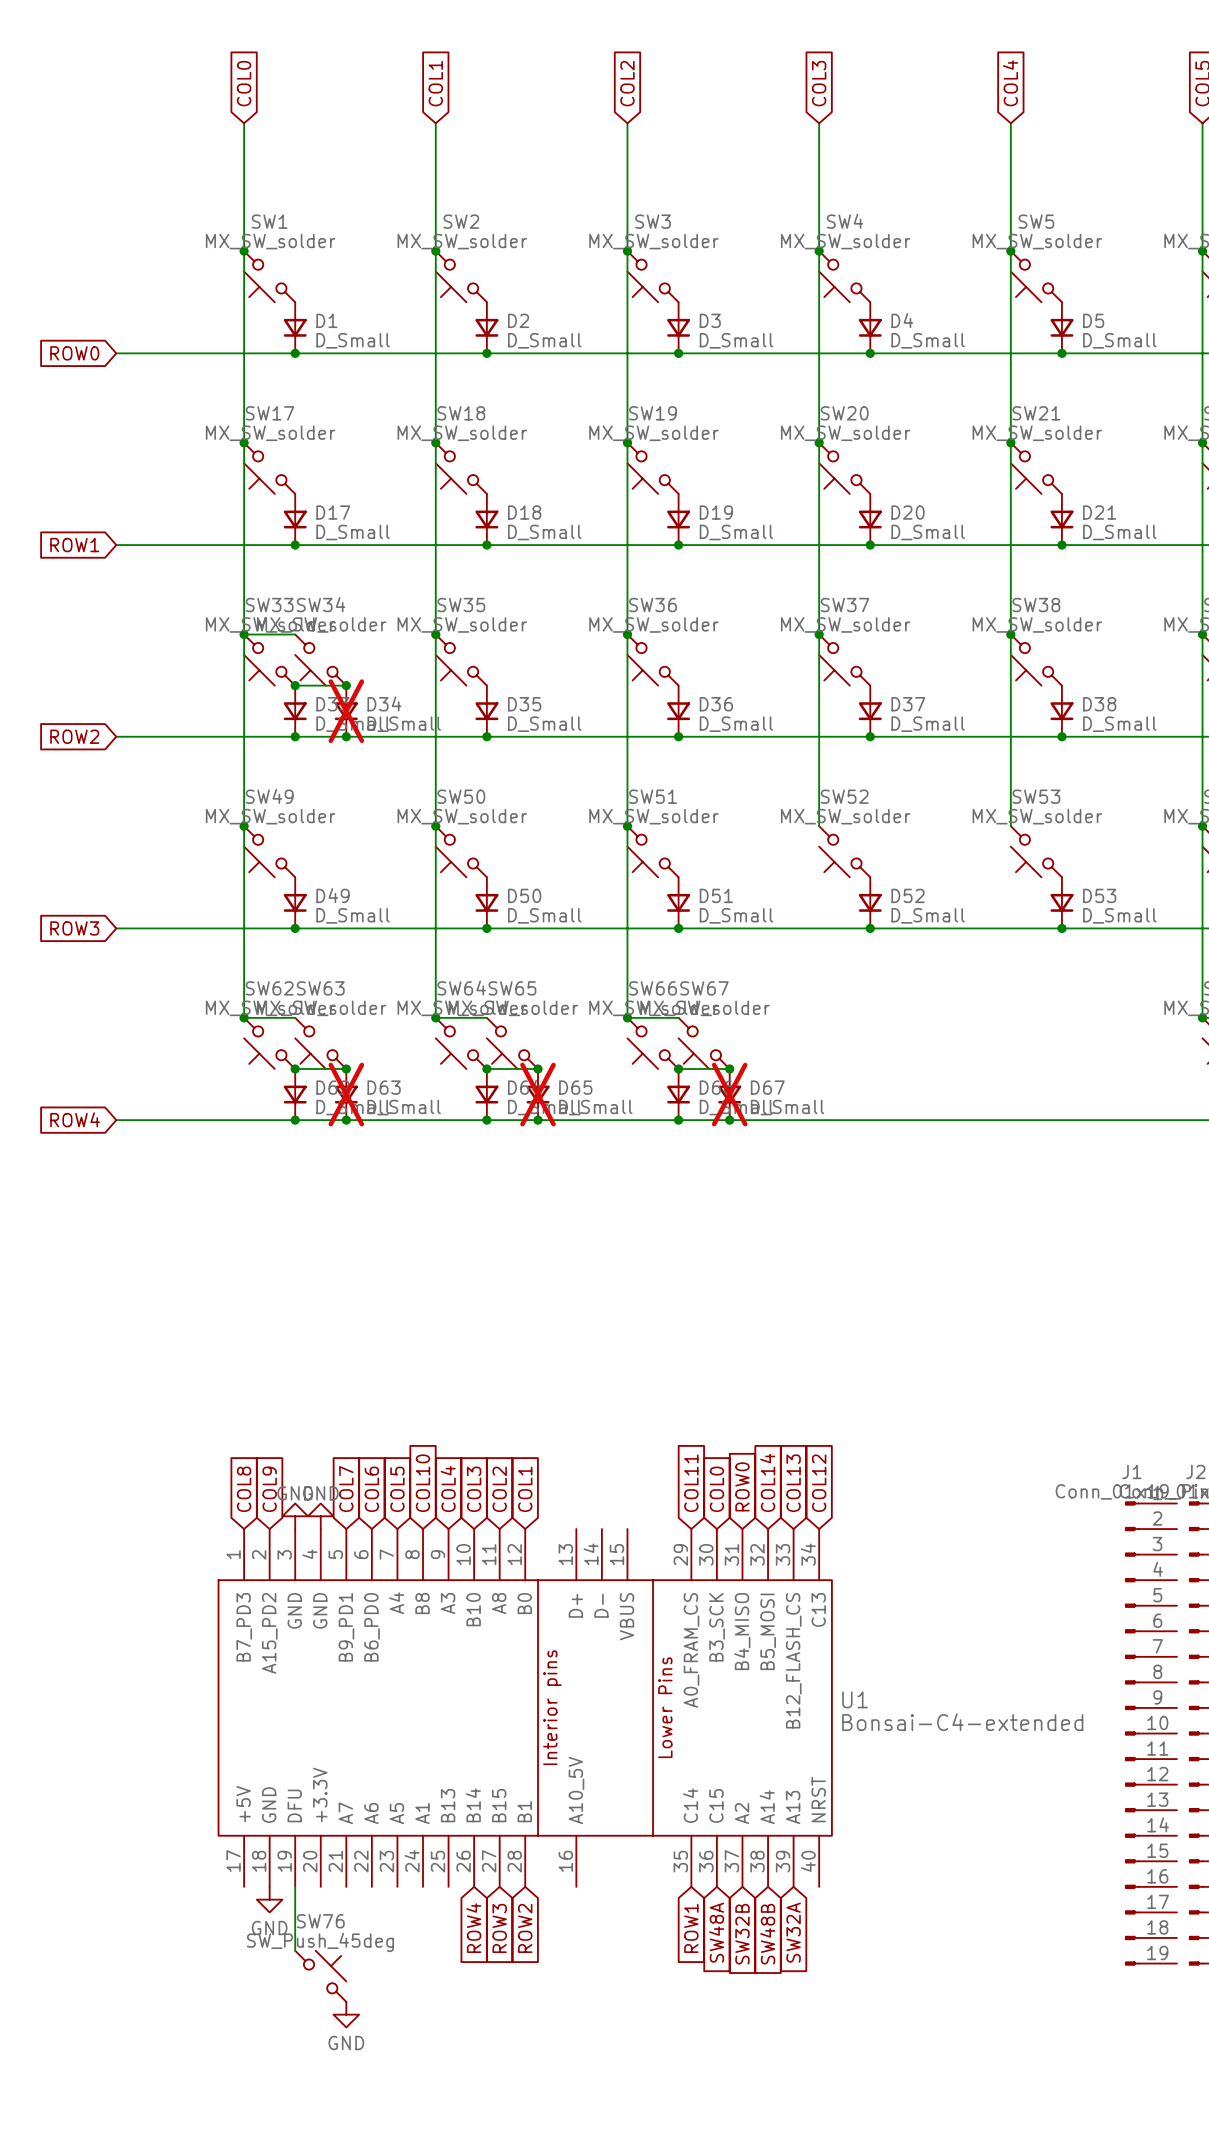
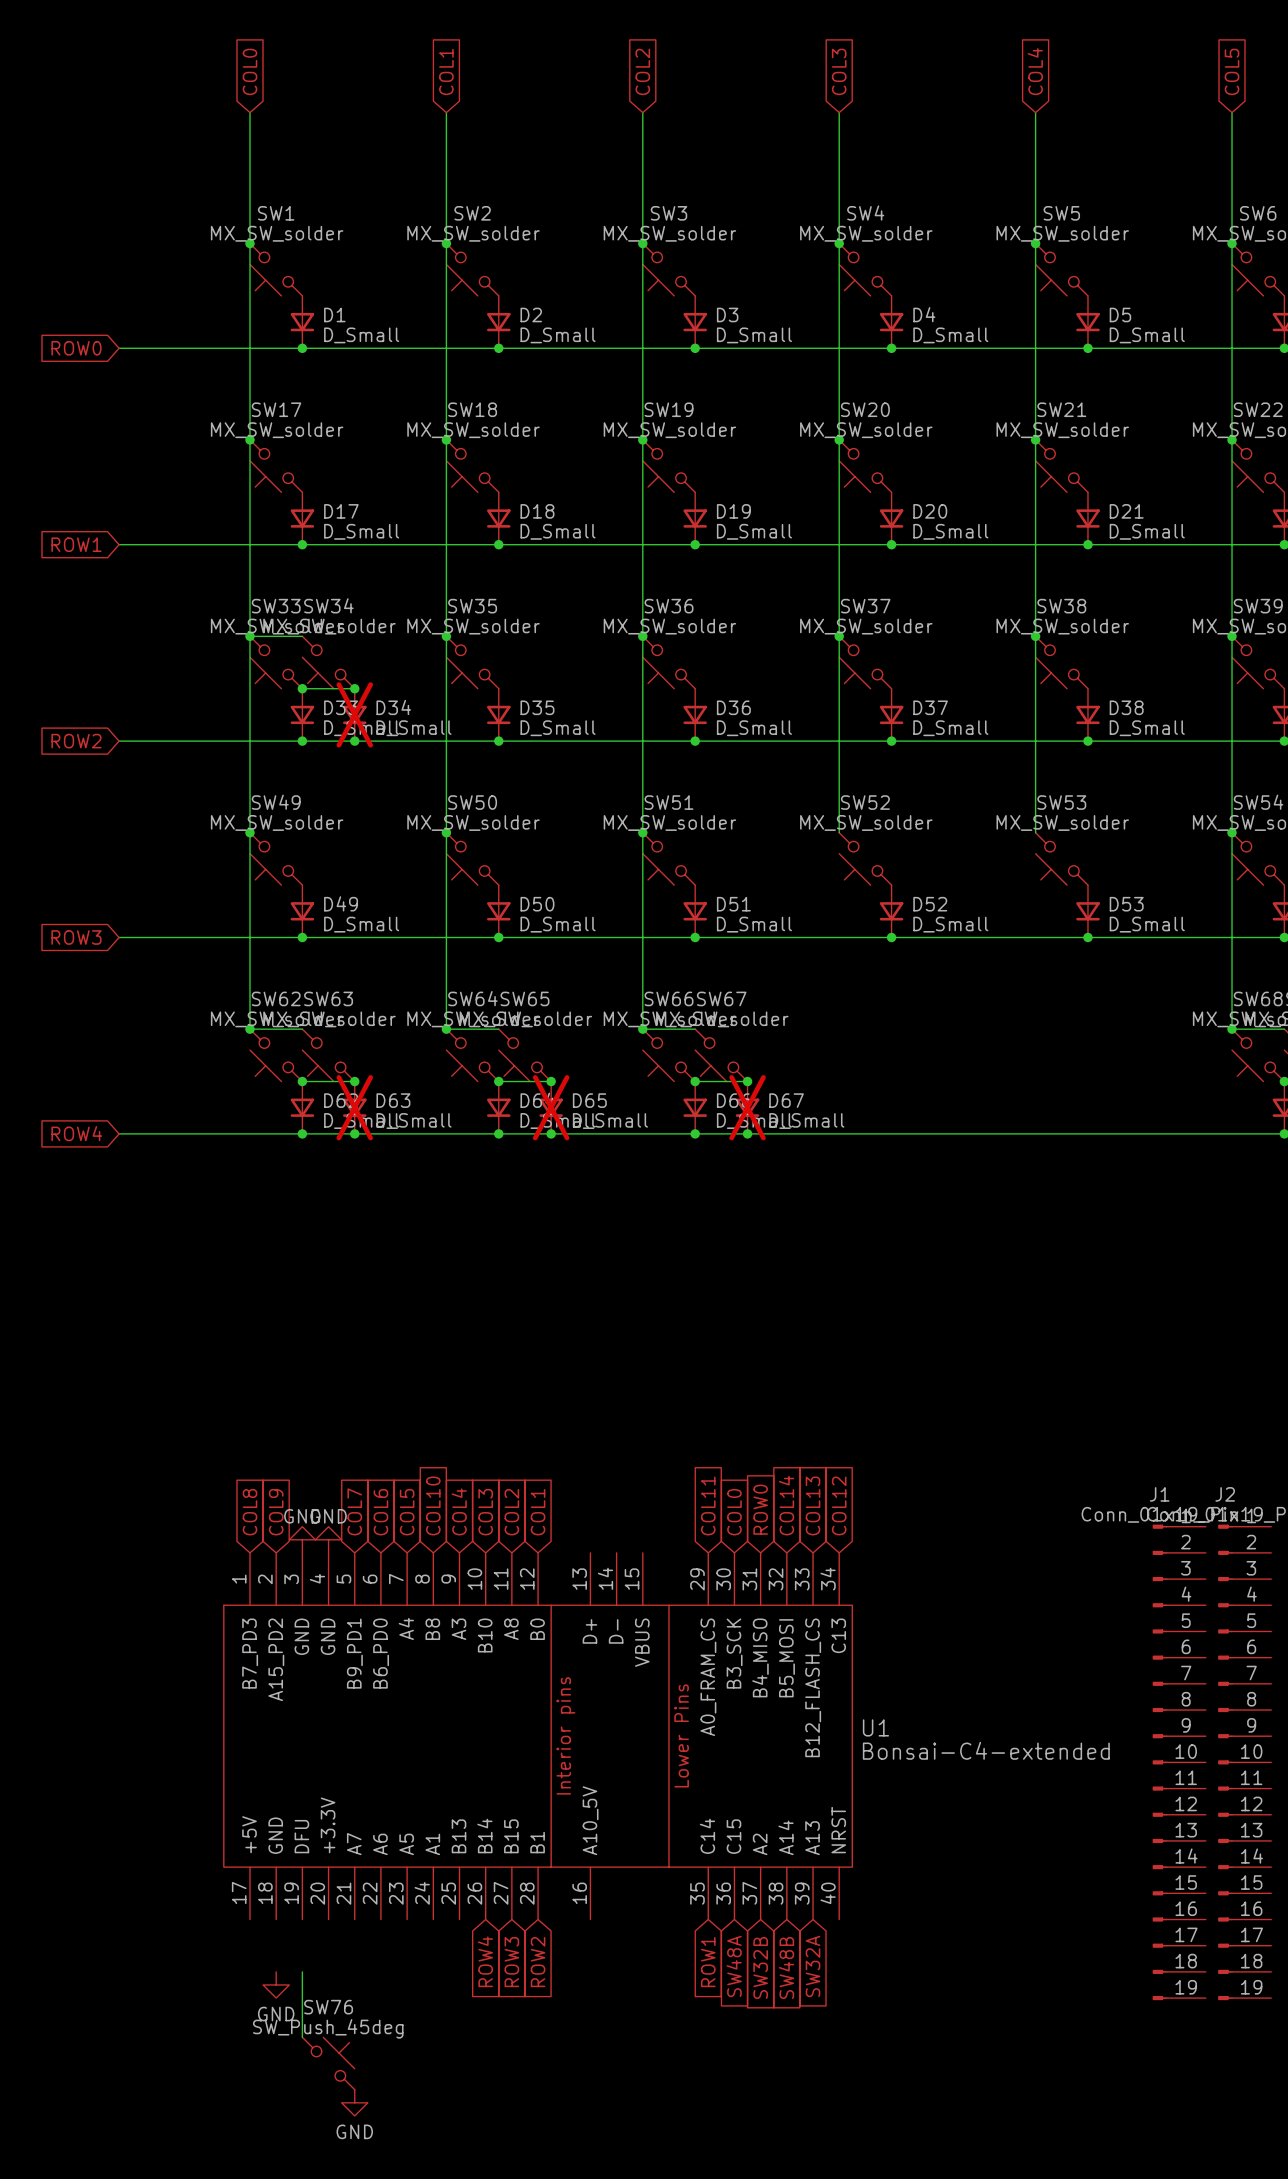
wire: (295, 1886) (295, 1937) -> (302, 1984) (302, 2037)
power symbol: GND (269, 1899) -> none
power symbol: none -> GND (276, 1984)
SW76 position: (320, 1976) -> (328, 2063)
power symbol: GND (346, 2014) -> none
power symbol: none -> GND (354, 2102)

